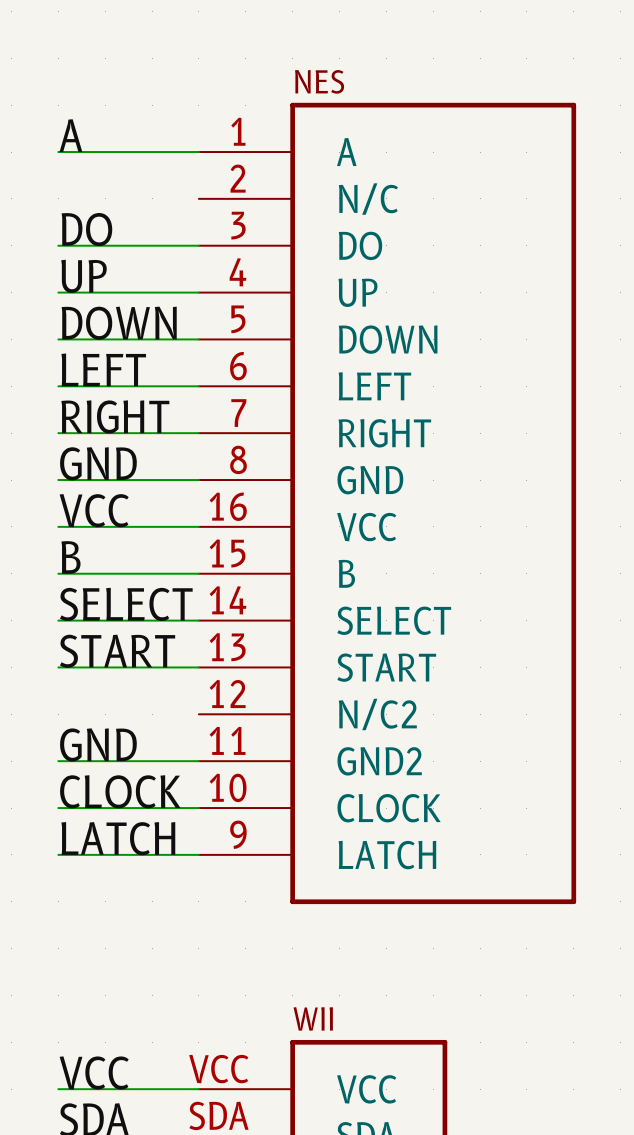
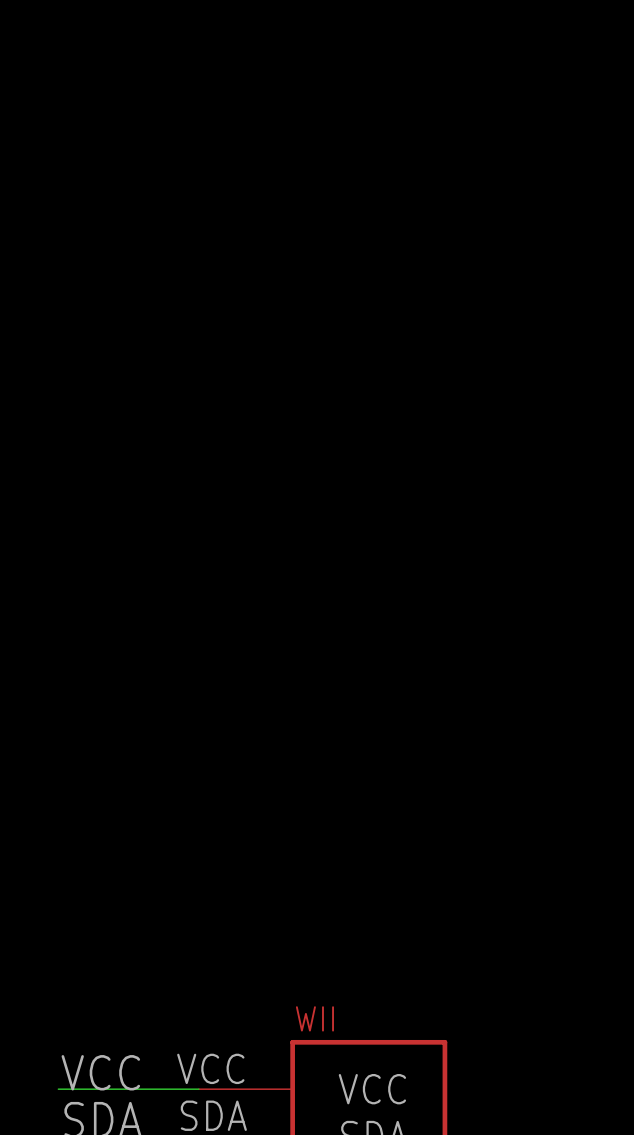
label: A (70, 135) -> none
wire: (58, 152) (198, 152) -> none
label: DO (86, 229) -> none
wire: (58, 245) (198, 245) -> none
label: UP (83, 276) -> none
wire: (58, 292) (198, 292) -> none
label: DOWN (119, 323) -> none
wire: (58, 339) (198, 339) -> none
label: LEFT (103, 369) -> none
wire: (58, 386) (198, 386) -> none
label: RIGHT (115, 416) -> none
wire: (58, 433) (198, 433) -> none
label: GND (98, 463) -> none
wire: (58, 480) (198, 480) -> none
NES: (387, 503) -> none
label: VCC (94, 510) -> none
wire: (58, 526) (198, 526) -> none
label: B (70, 557) -> none
wire: (58, 573) (198, 573) -> none
label: SELECT (126, 604) -> none
wire: (58, 620) (198, 620) -> none
label: START (117, 651) -> none
wire: (58, 667) (198, 667) -> none
label: GND (98, 744) -> none
wire: (58, 761) (198, 761) -> none
label: CLOCK (120, 791) -> none
wire: (58, 808) (198, 808) -> none
label: LATCH (118, 838) -> none
wire: (58, 854) (198, 854) -> none

